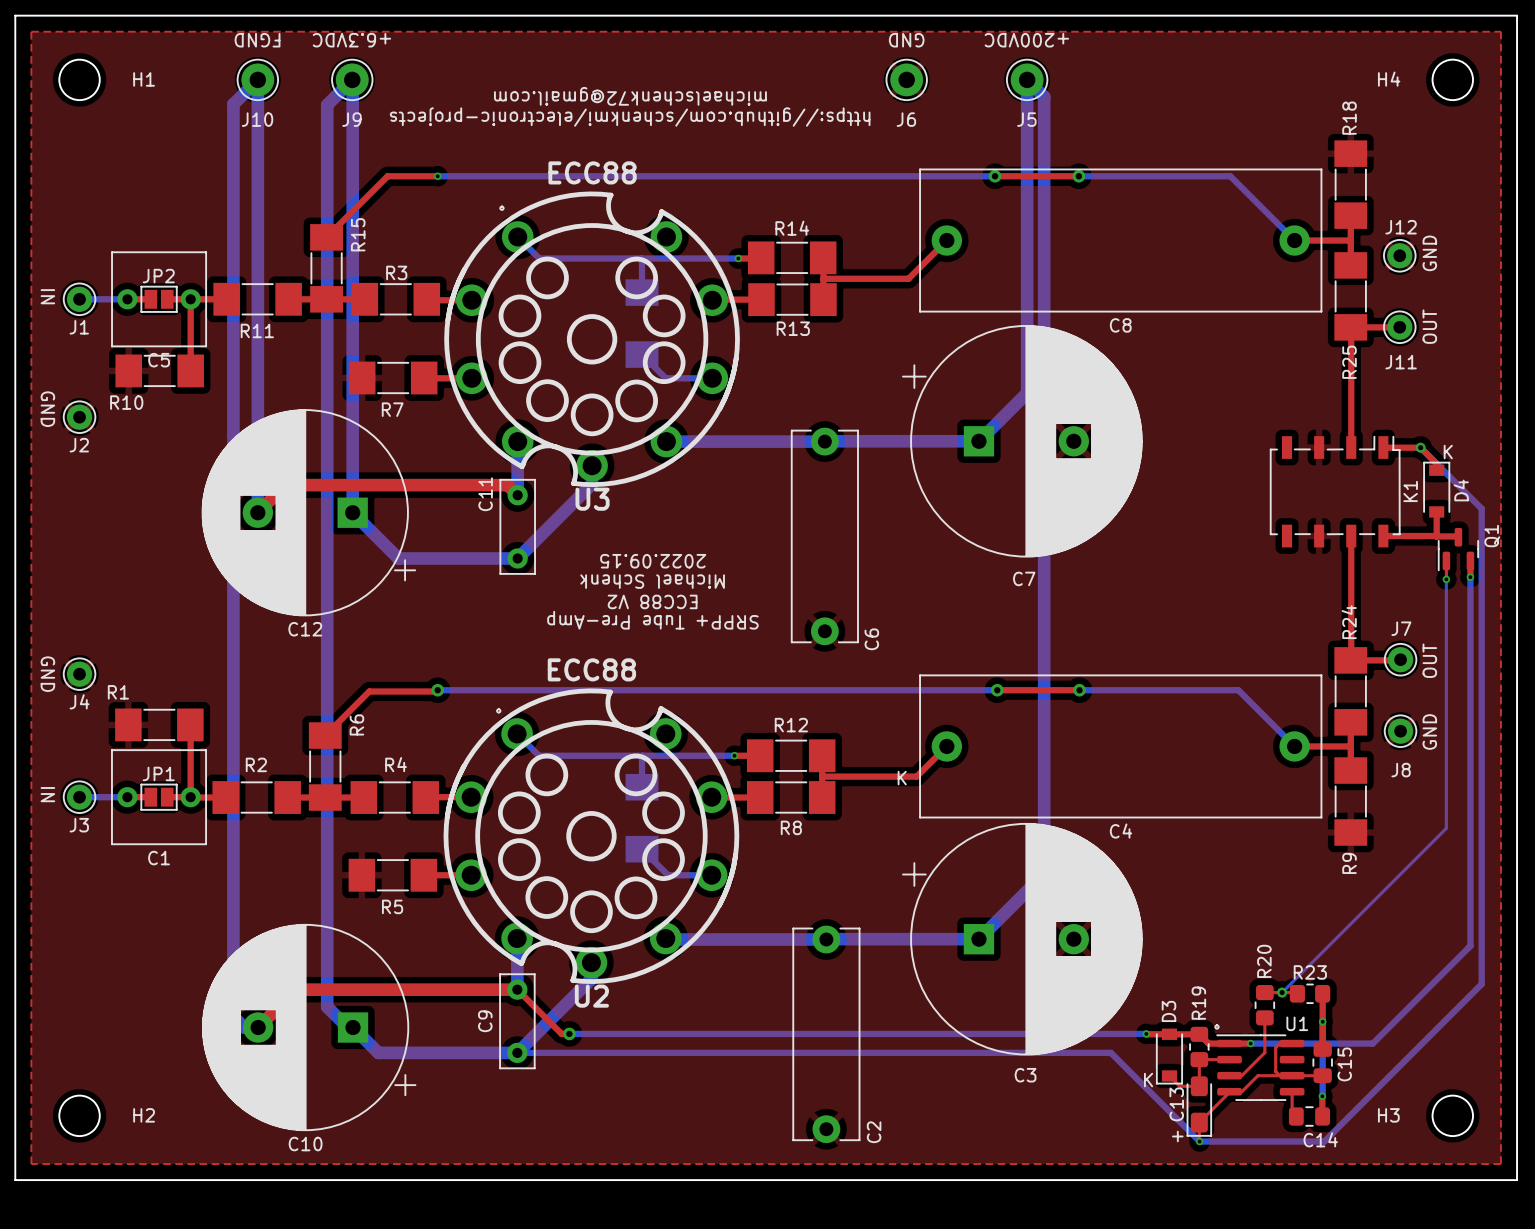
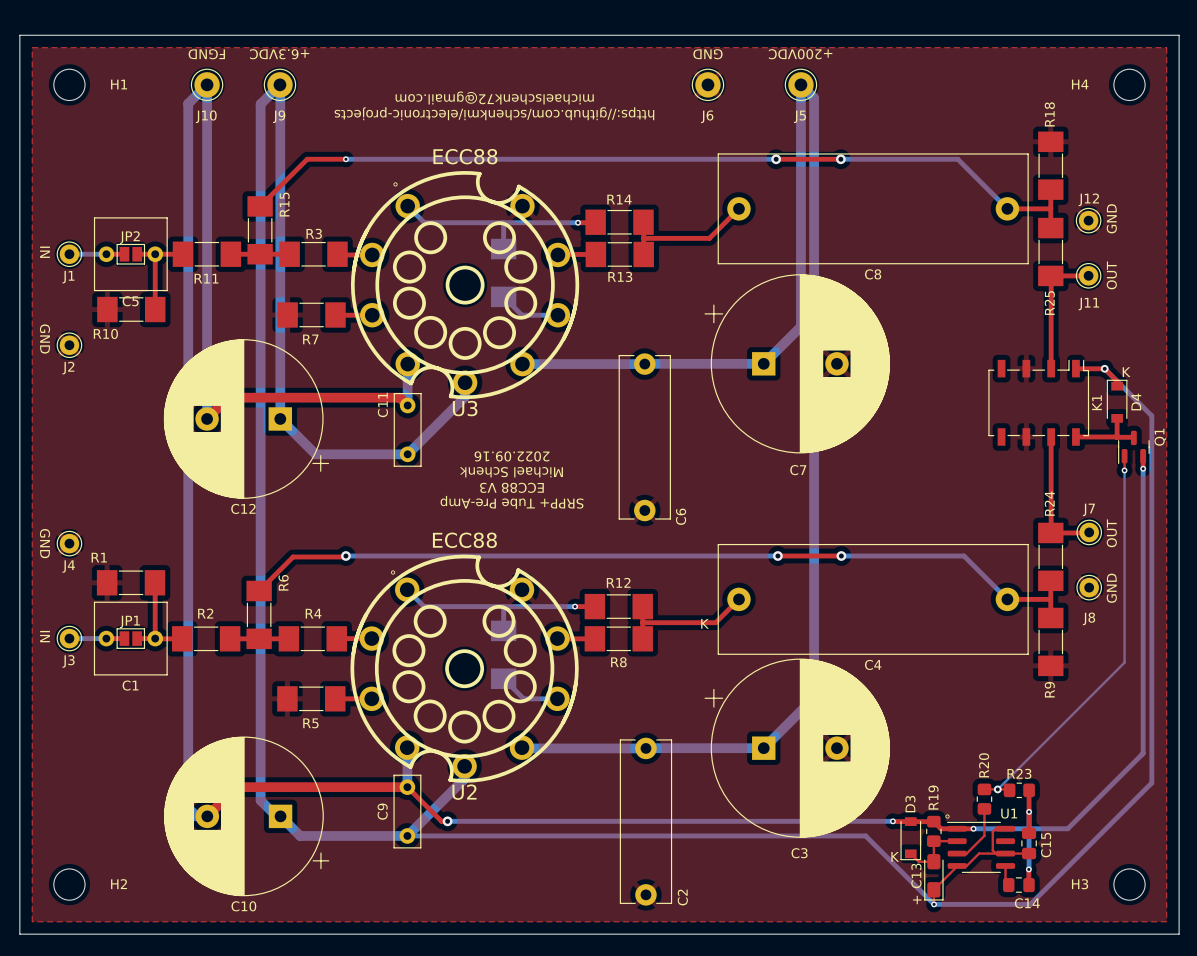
U3 footprint: [444, 191, 740, 488] -> [350, 171, 580, 400]
text: 2022.09.15 (653, 561) -> 2022.09.16 (512, 456)
text: ECC88 V2 (652, 601) -> ECC88 V3 (511, 487)
U2 footprint: [443, 688, 740, 984] -> [350, 554, 579, 783]

